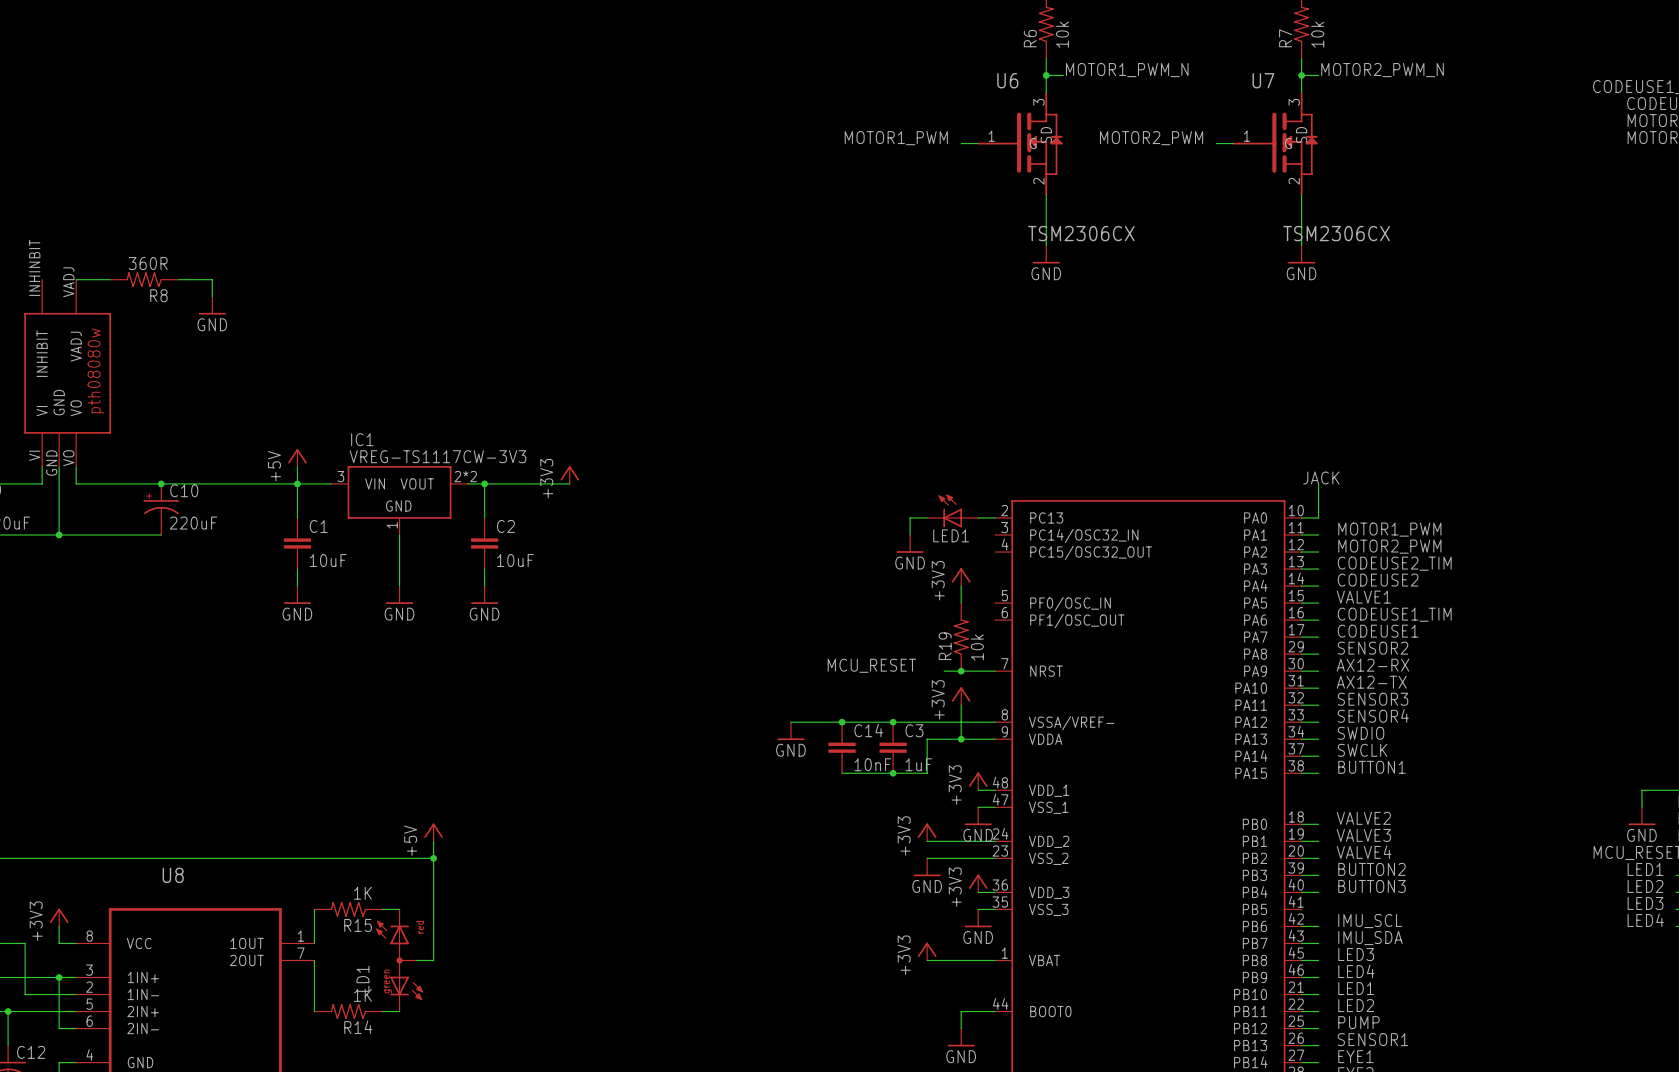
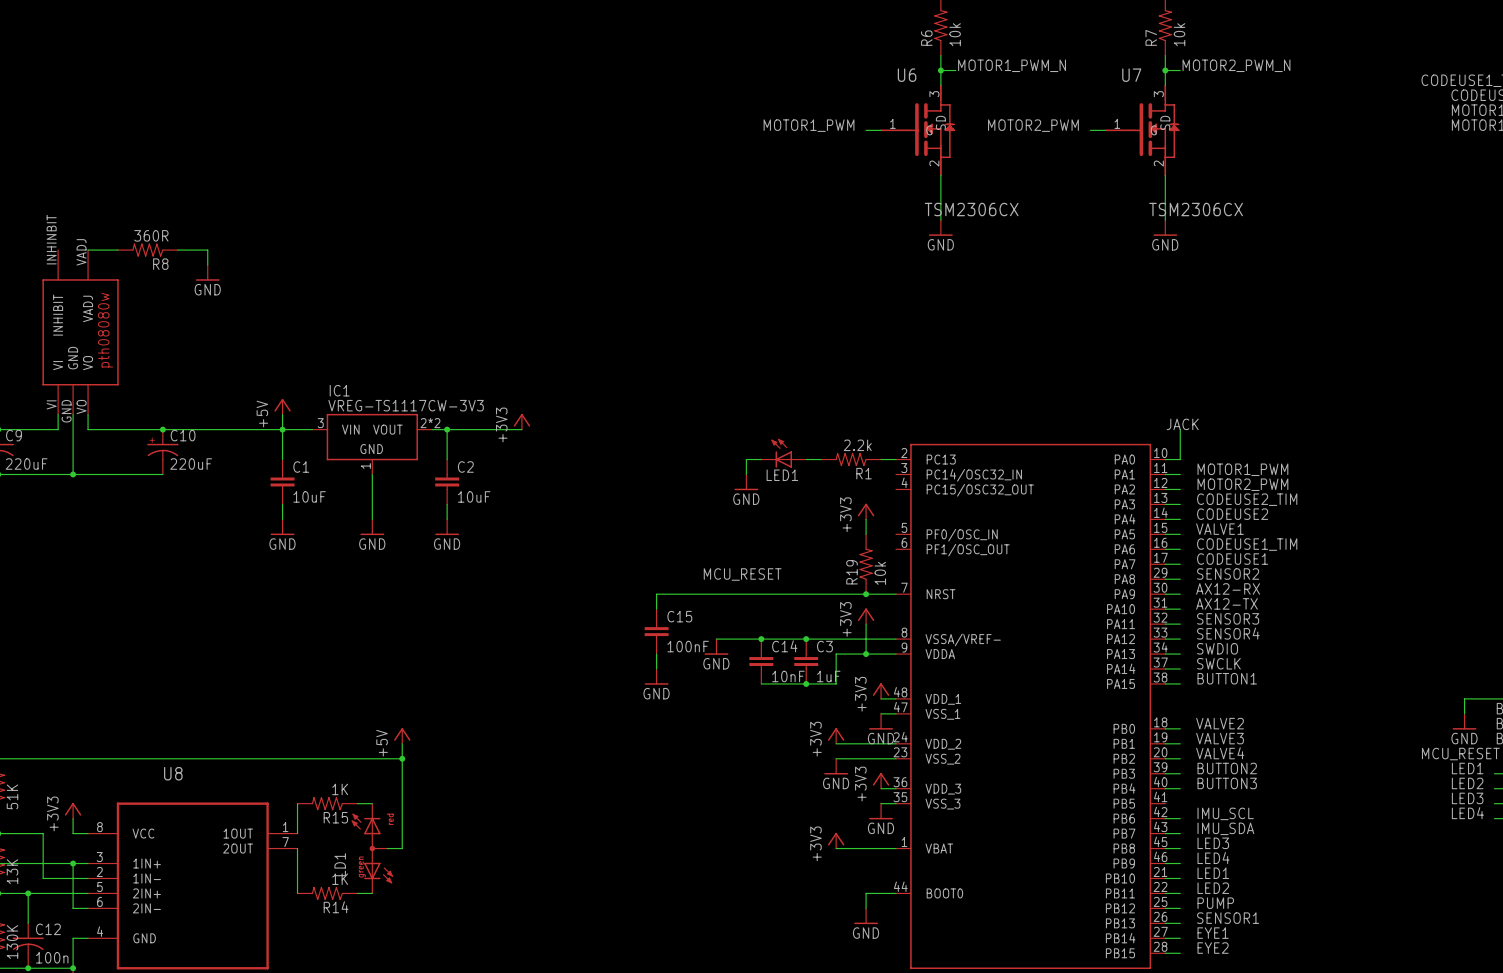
LED1 position: (952, 510) -> (783, 453)
wire: none -> (806, 459) (821, 459)
wire: (927, 517) (910, 517) (910, 534) -> (761, 459) (746, 459) (746, 474)
R1: none -> 2.2k (851, 459)
power symbol position: GND (910, 543) -> GND (746, 482)
label position: MCU_RESET (871, 665) -> MCU_RESET (742, 574)
wire: none -> (851, 594) (656, 594) (656, 609)
C15: none -> 100nF (656, 631)
wire: none -> (656, 654) (656, 669)
power symbol: none -> GND (656, 676)

